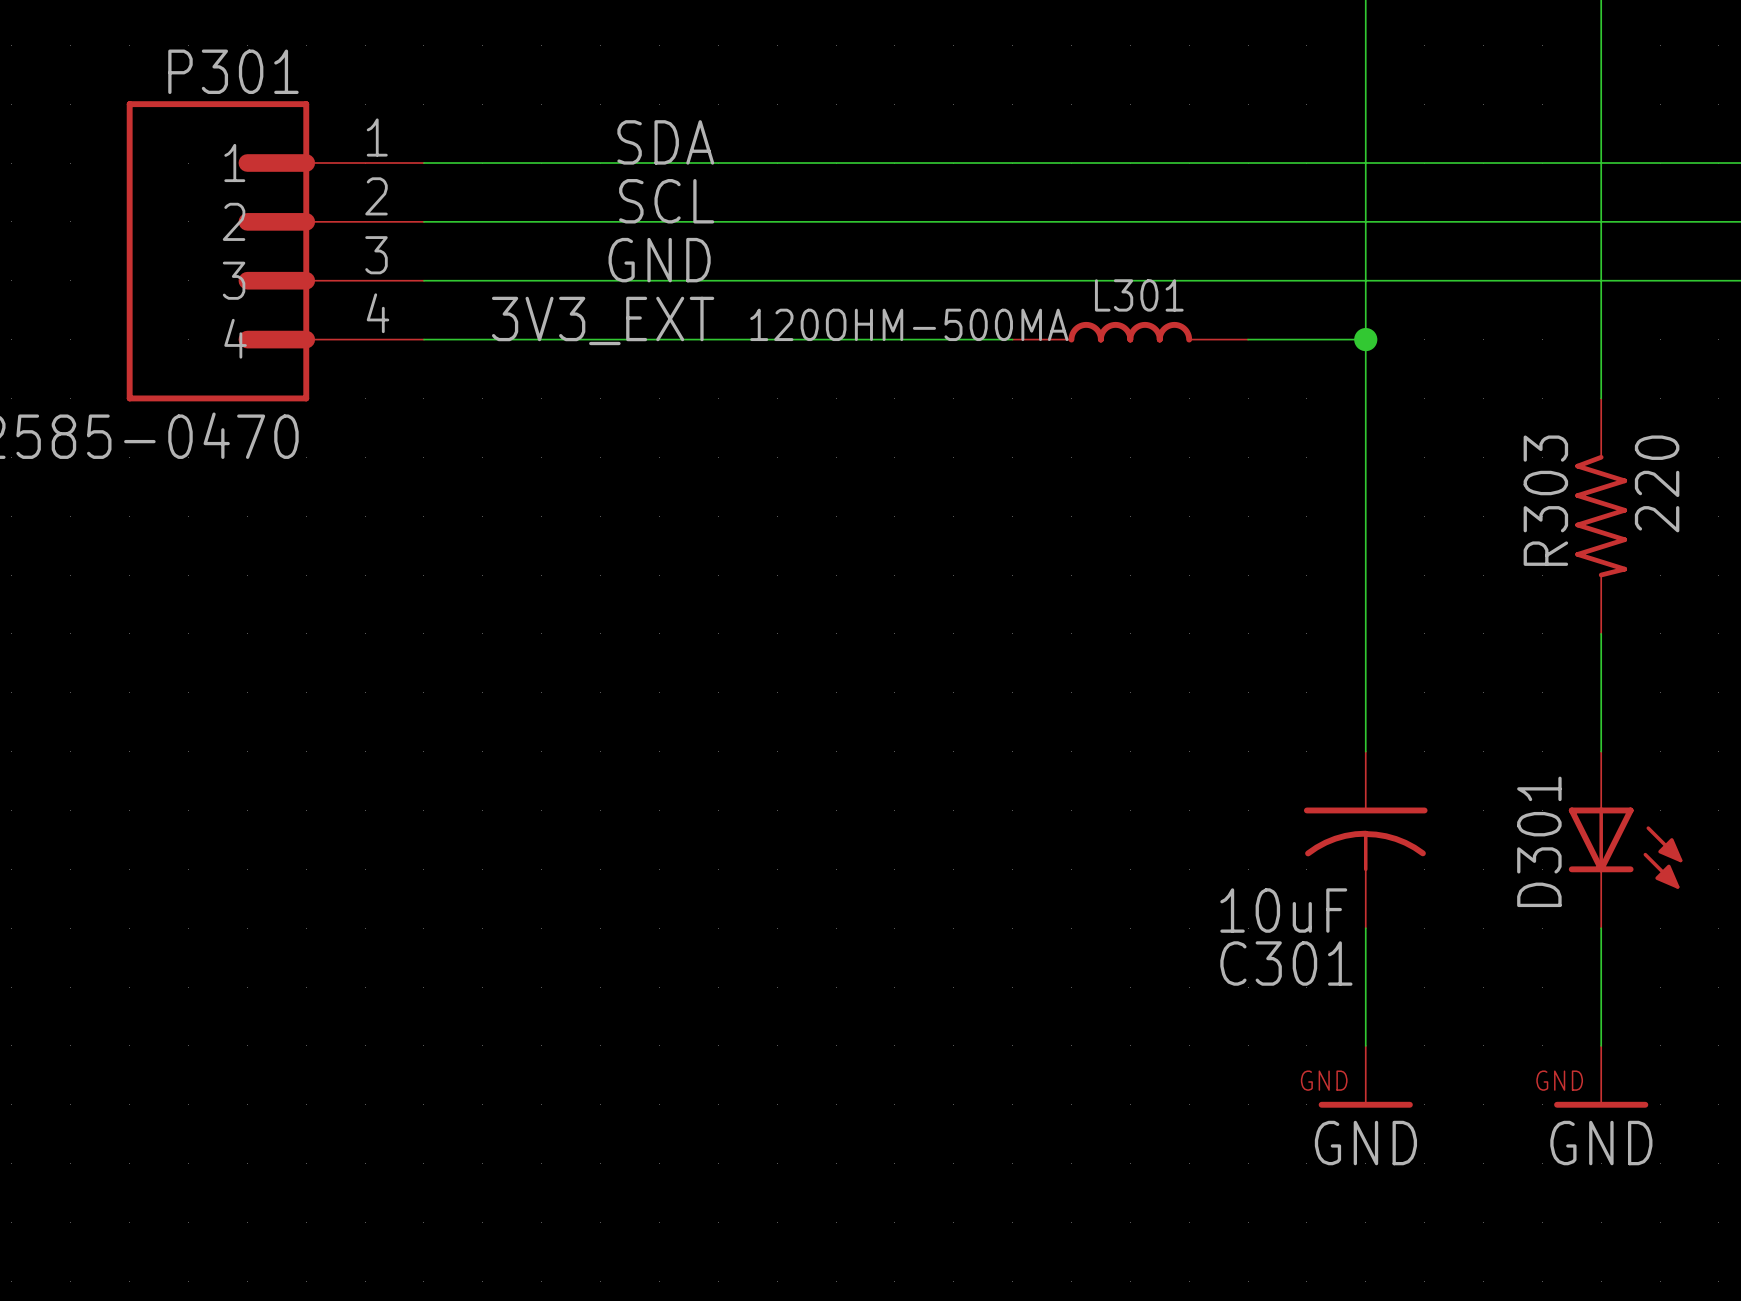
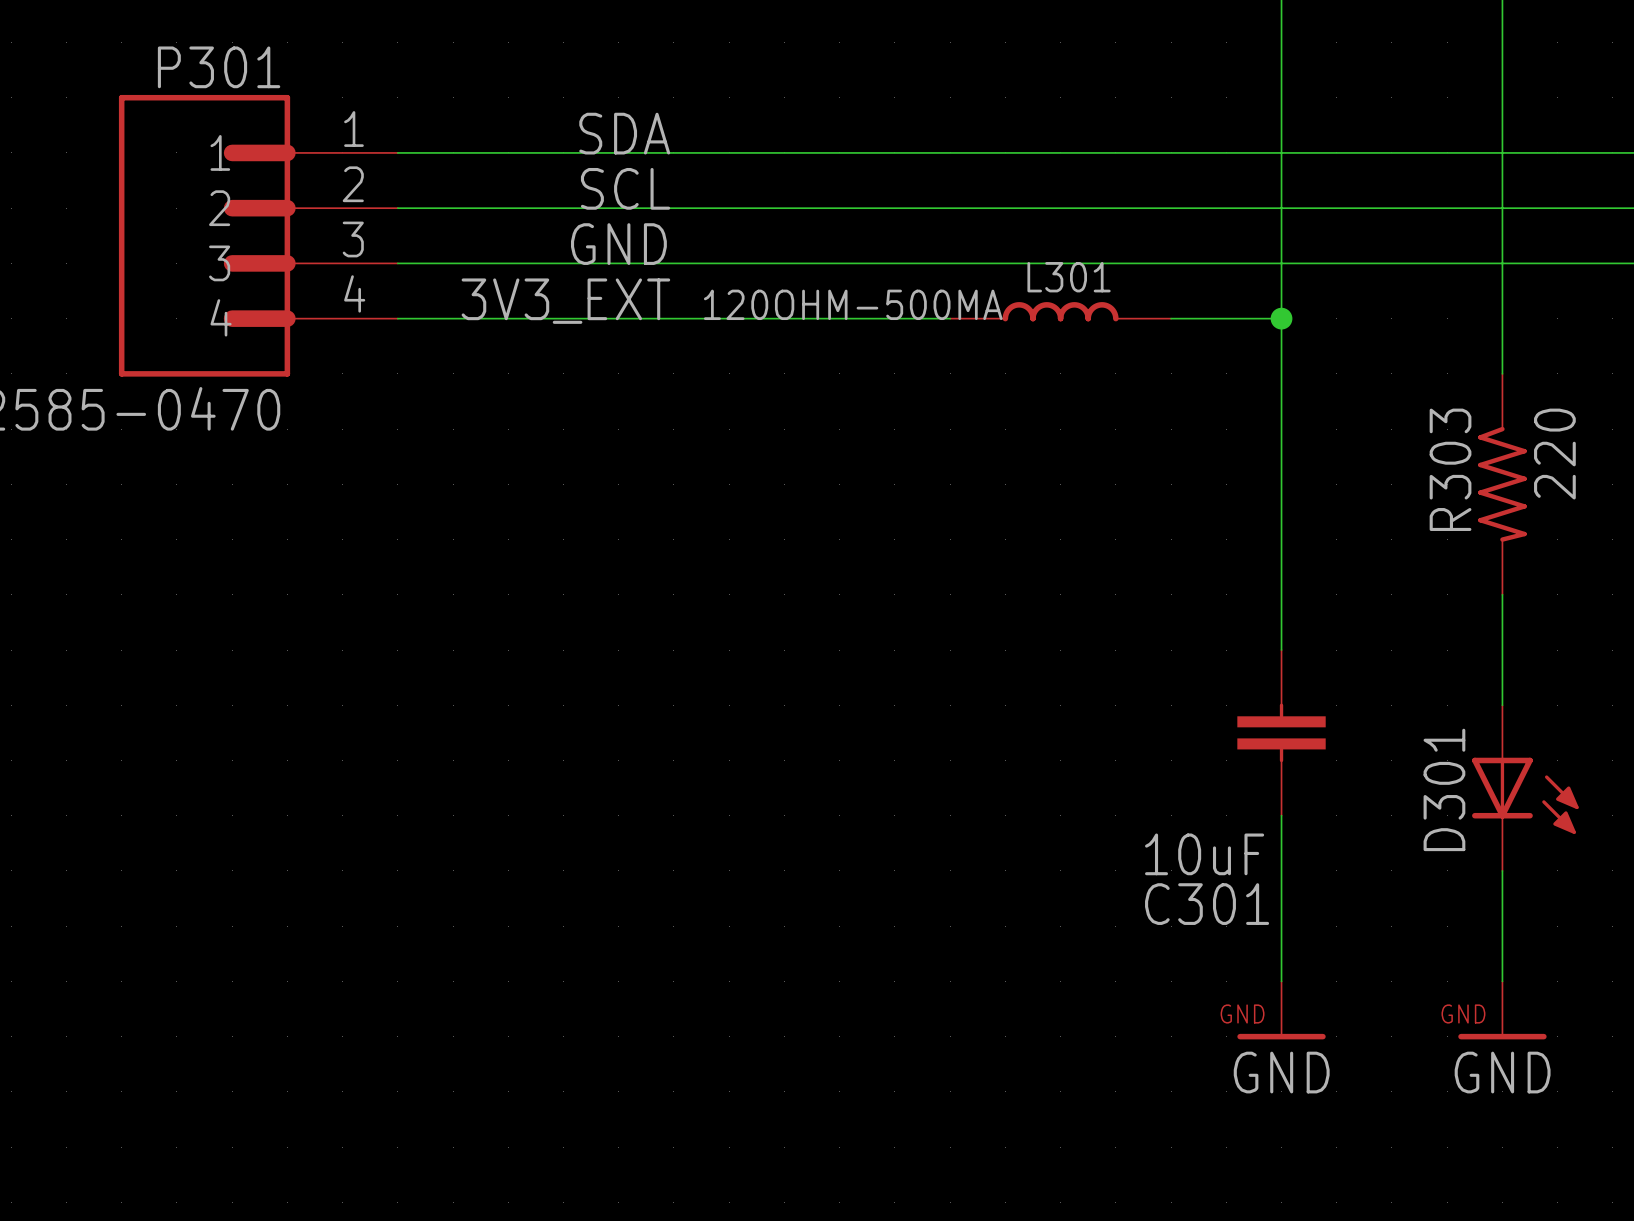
C301 symbol: [1303, 751, 1428, 929] -> [1237, 650, 1326, 816]

